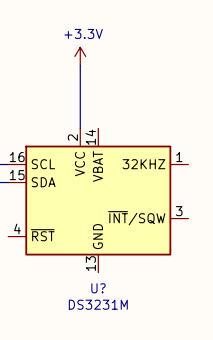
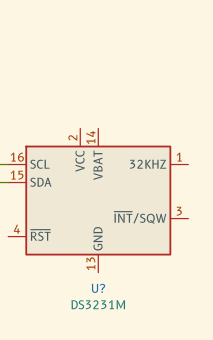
power symbol: +3.3V (80, 56) -> none
wire: (80, 65) (80, 128) -> none

